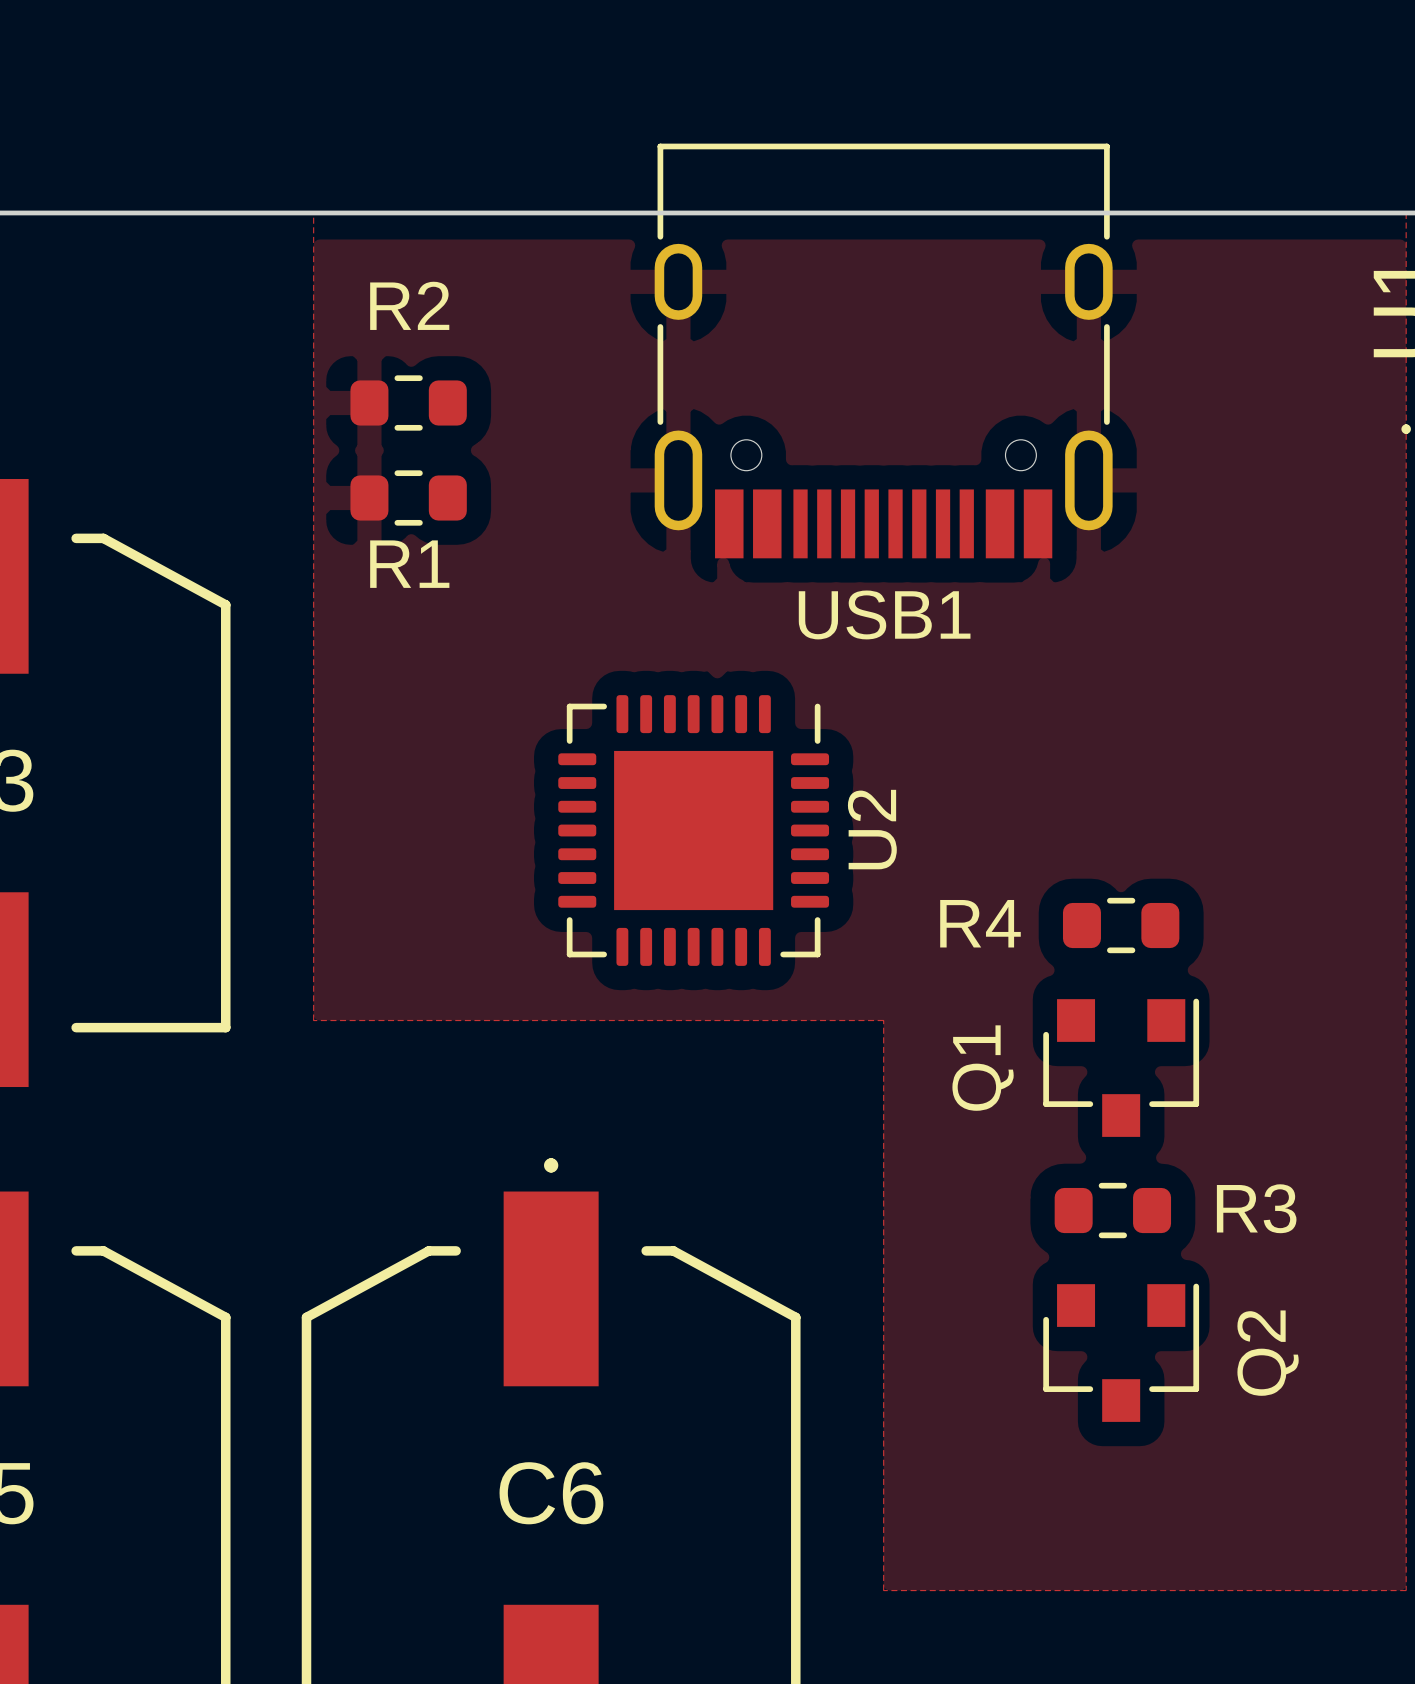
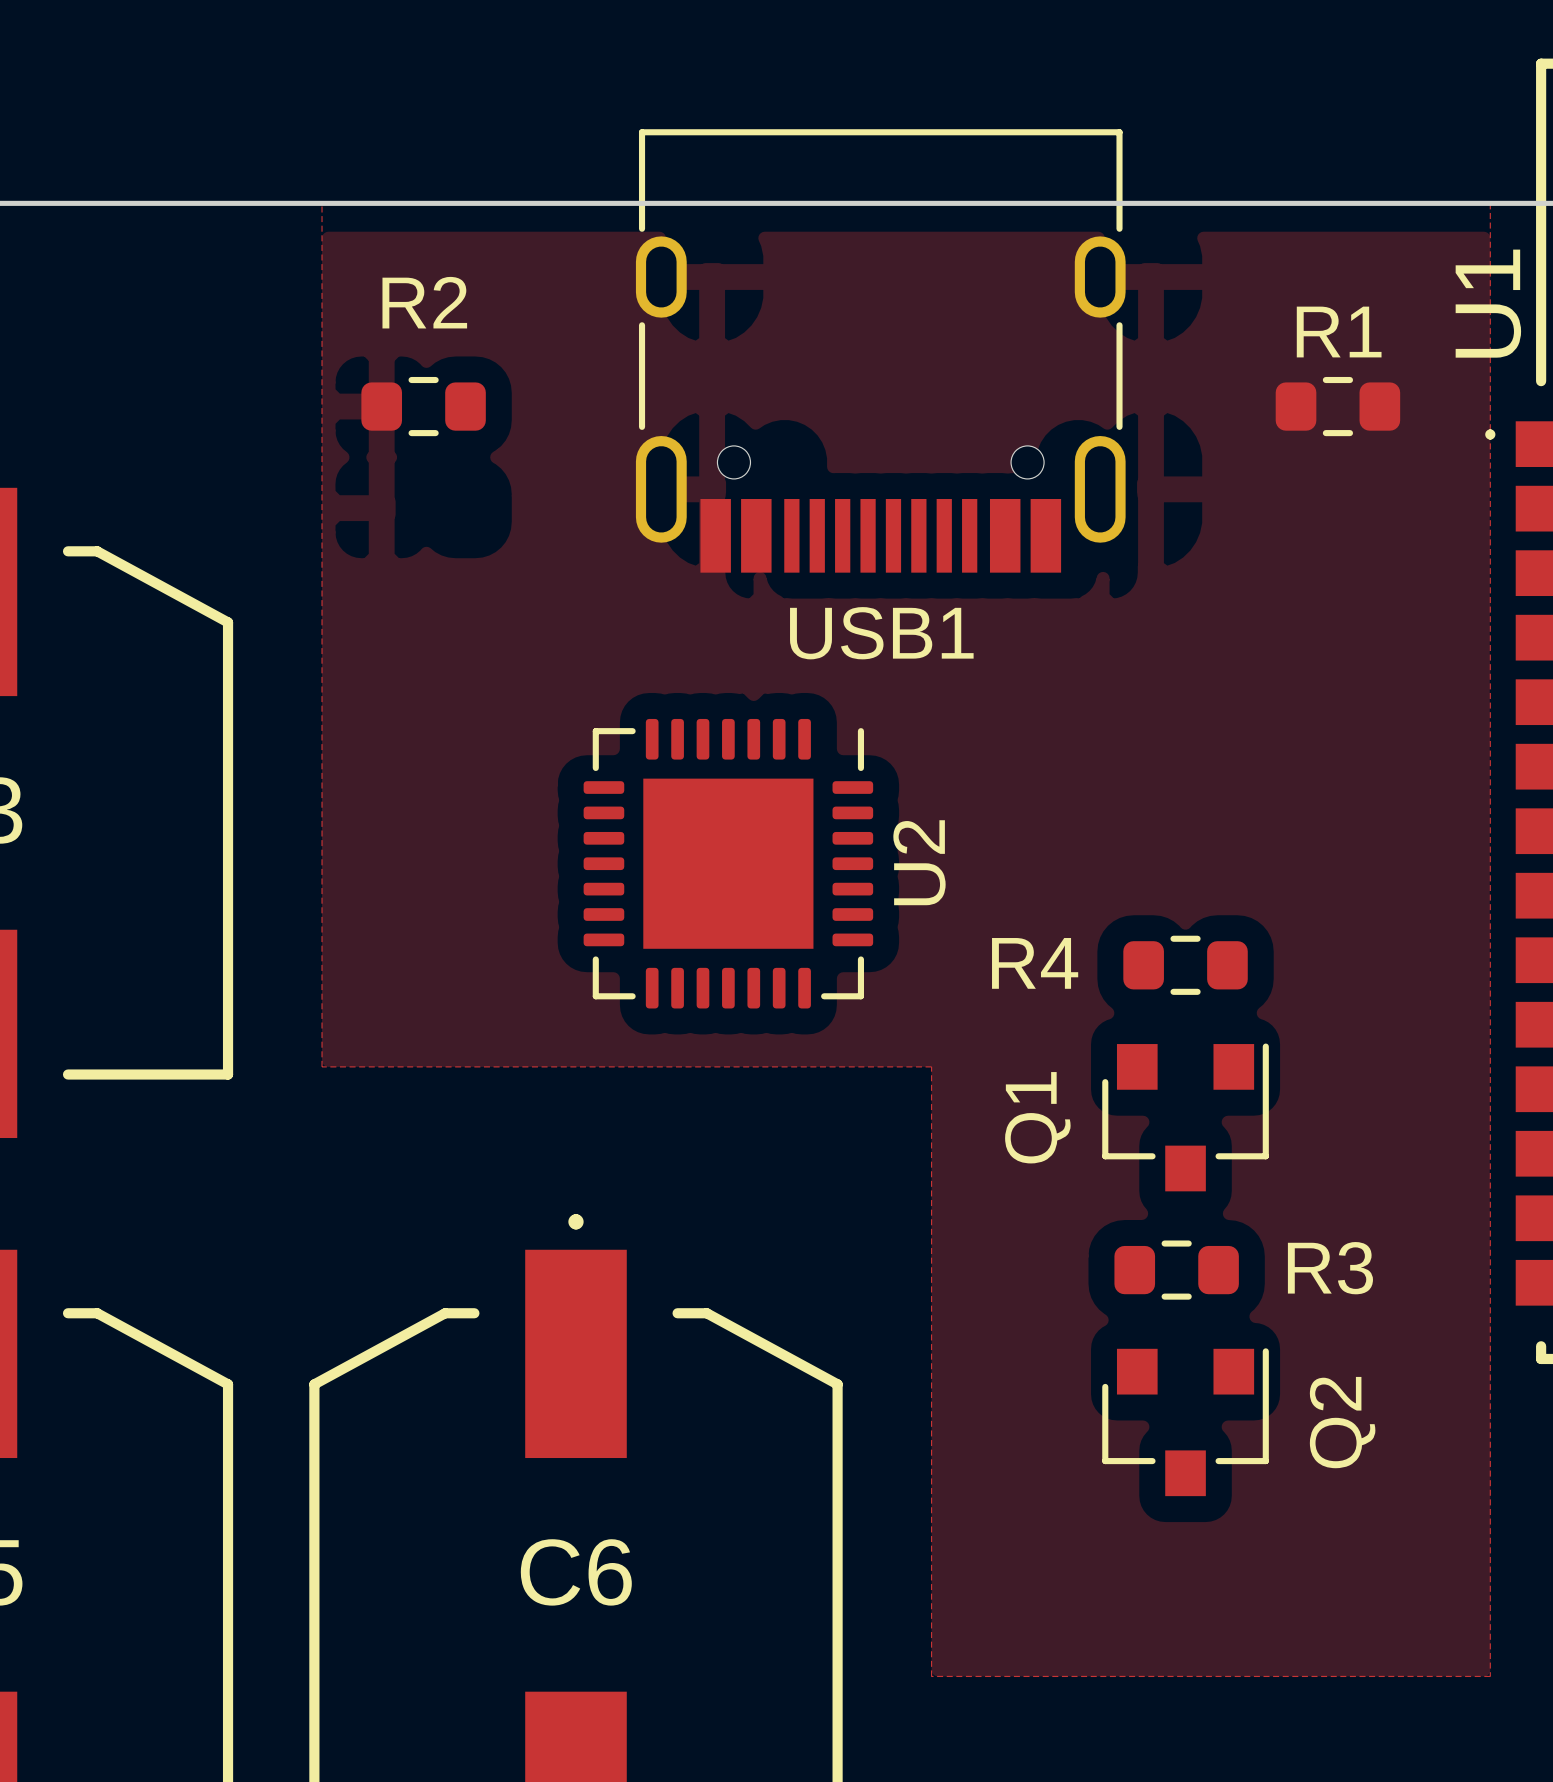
USB1 position: (883, 350) -> (880, 350)
R1 position: (408, 497) -> (1337, 406)
R1 name position: R1 (409, 564) -> R1 (1339, 332)

